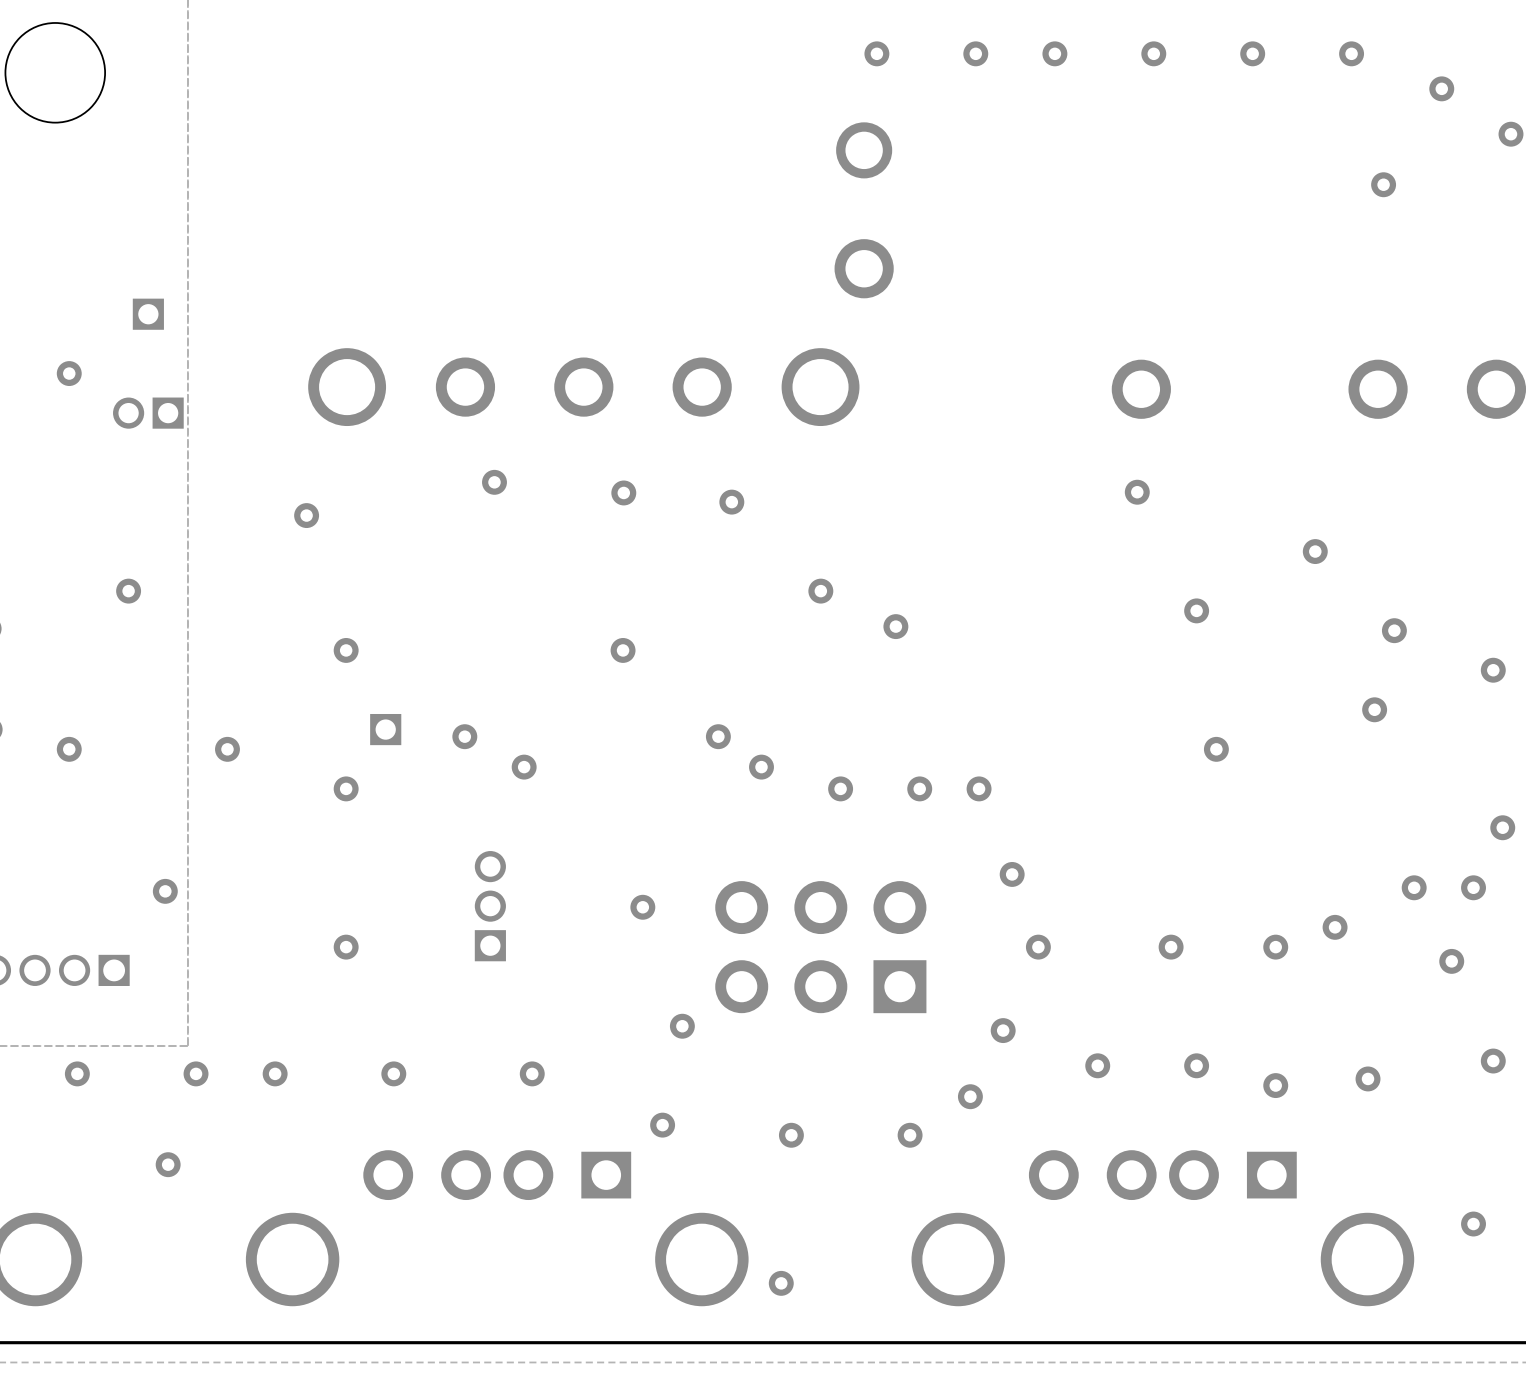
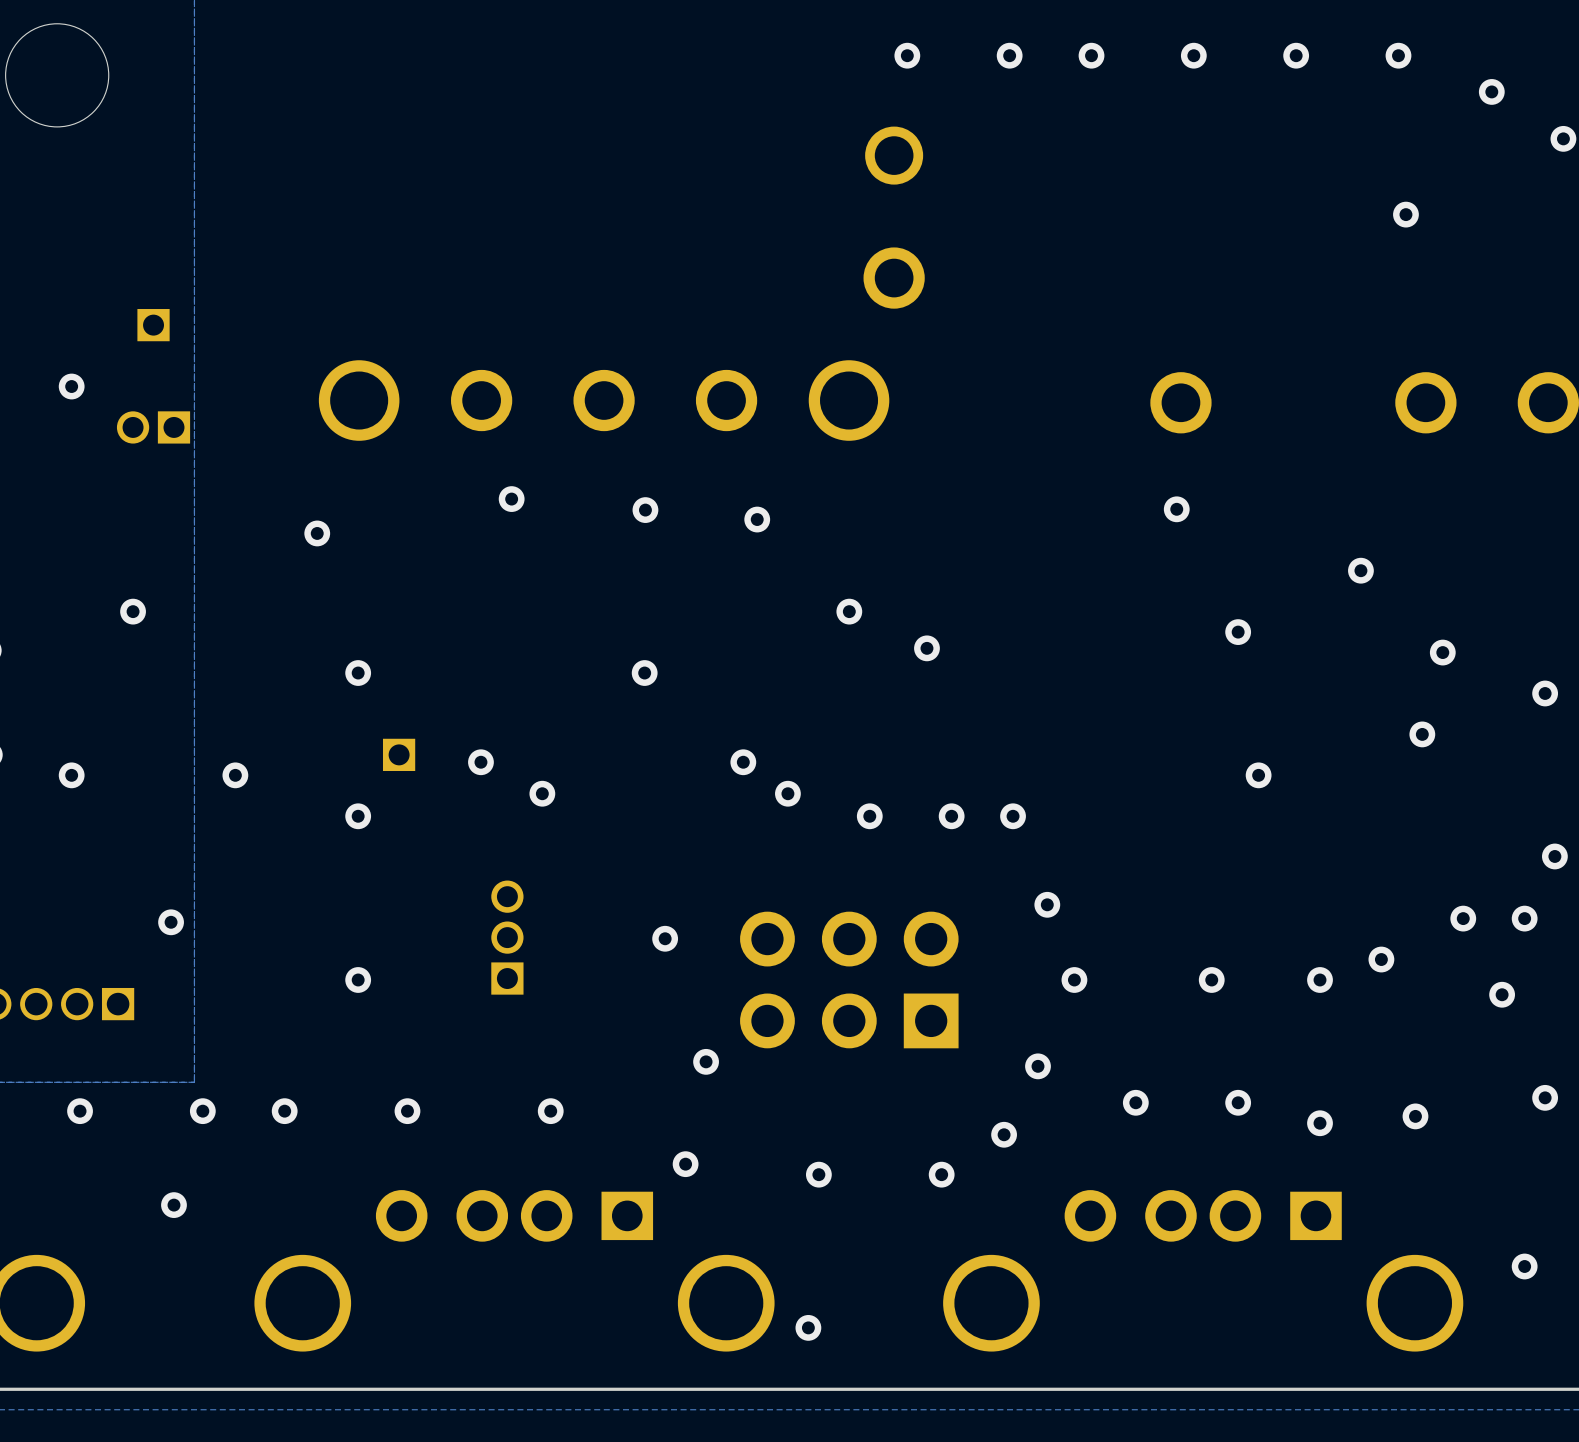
via position: (1383, 184) -> (1405, 214)

